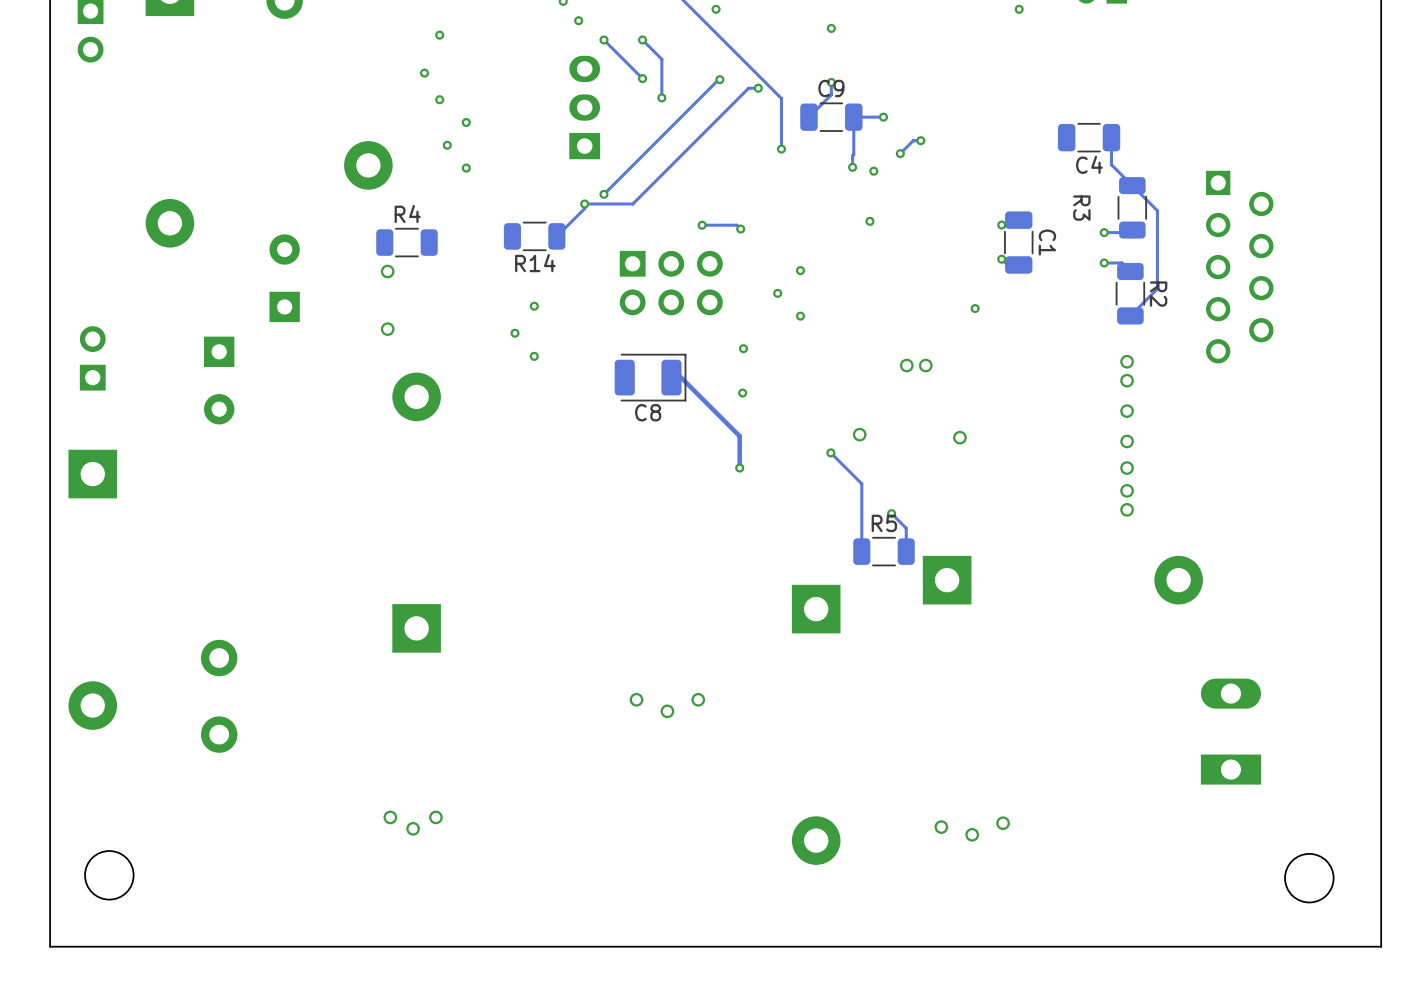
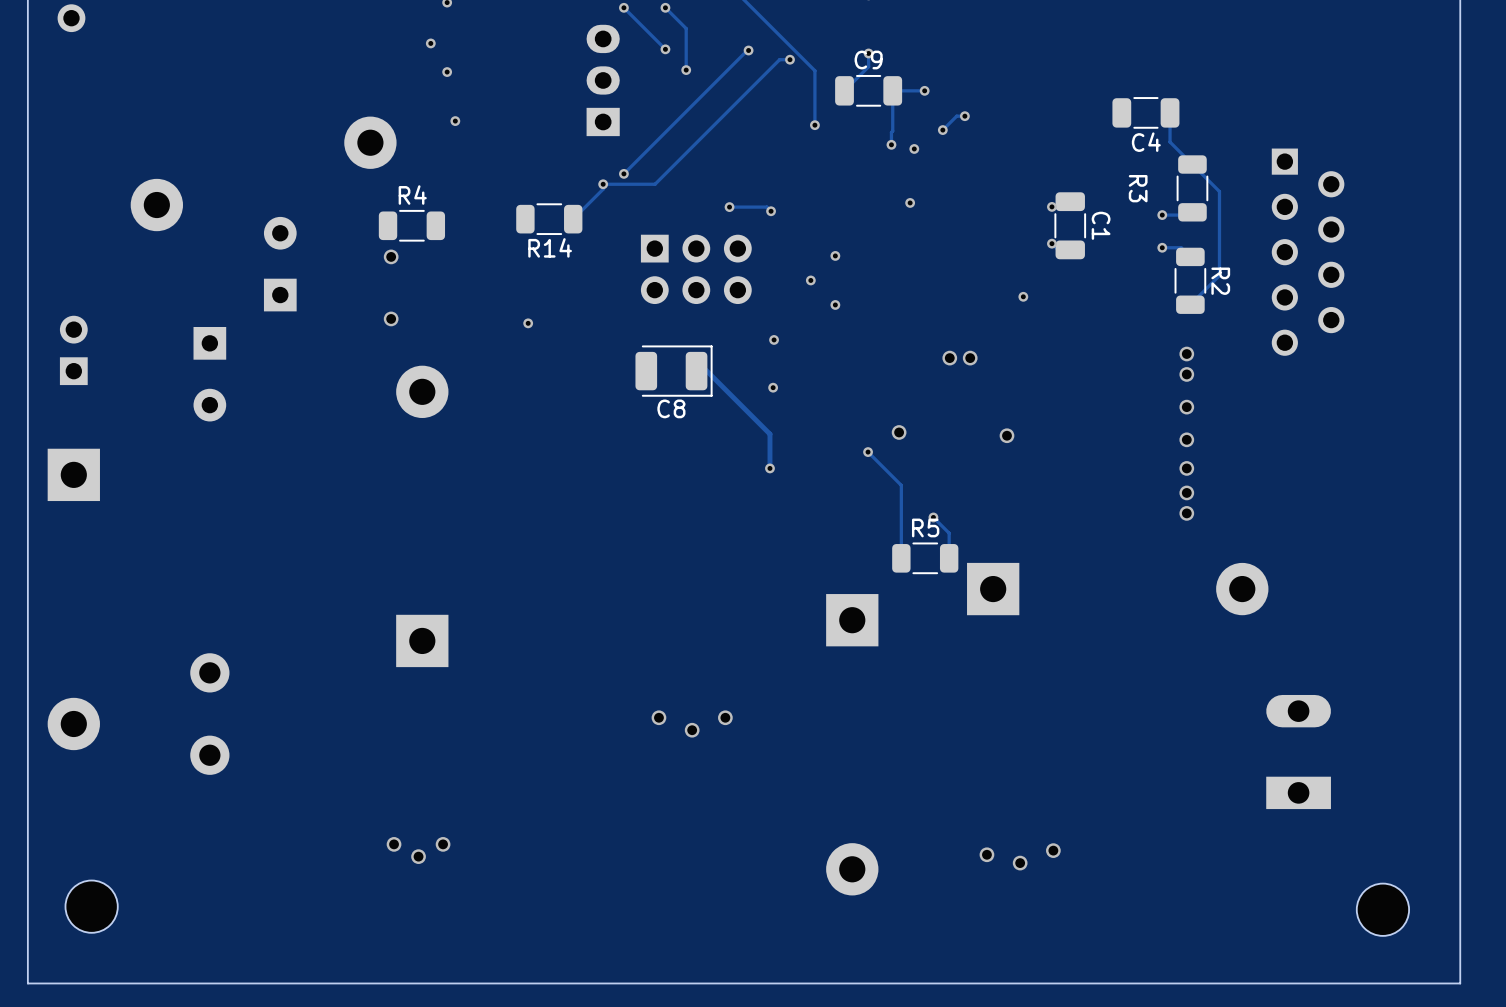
via: (466, 122) -> none
via: (466, 168) -> none
via: (534, 306) -> none
via: (534, 356) -> none

